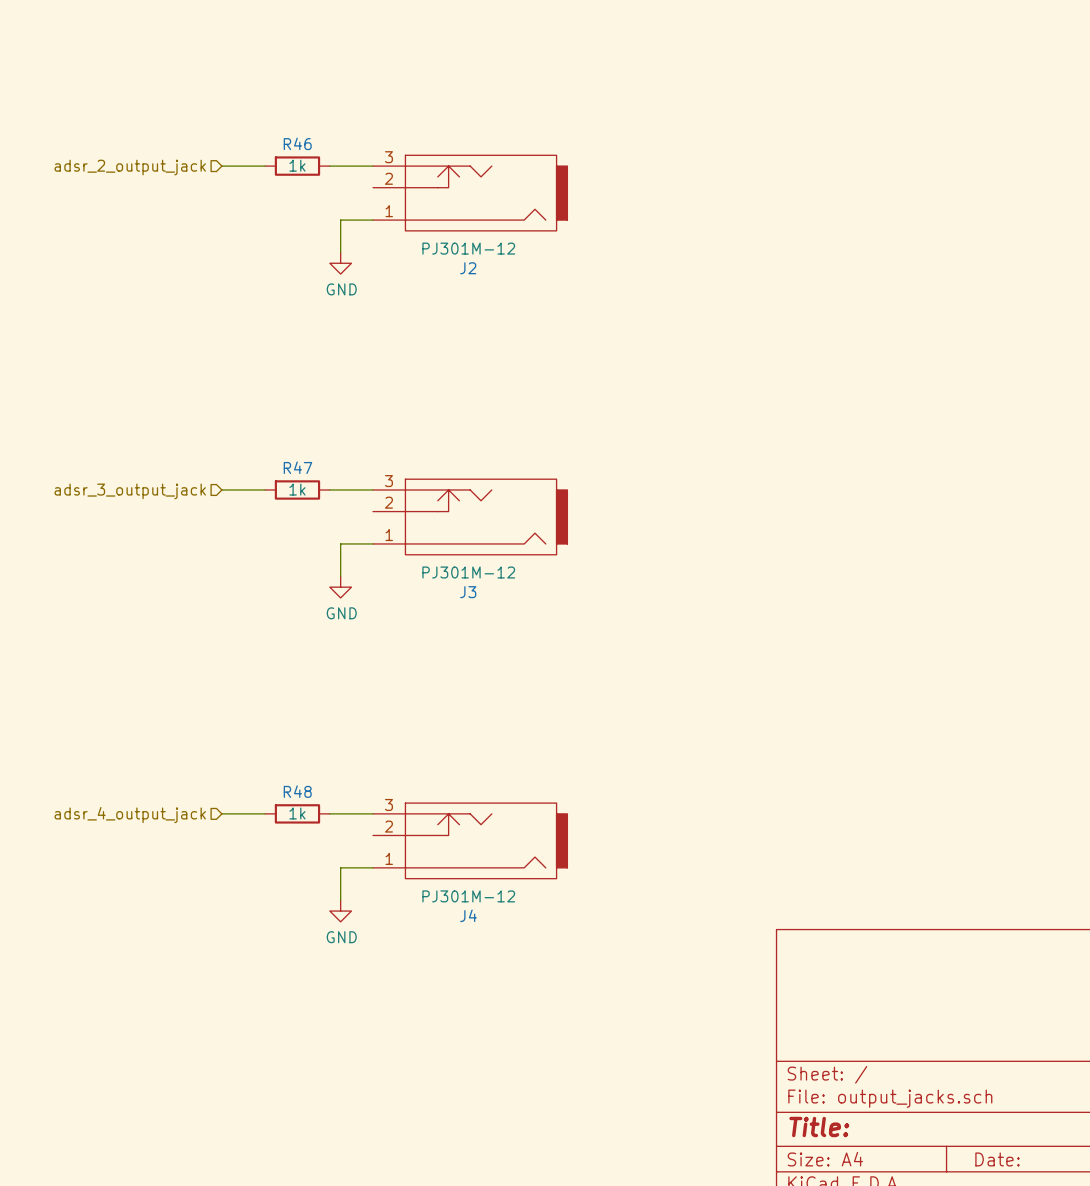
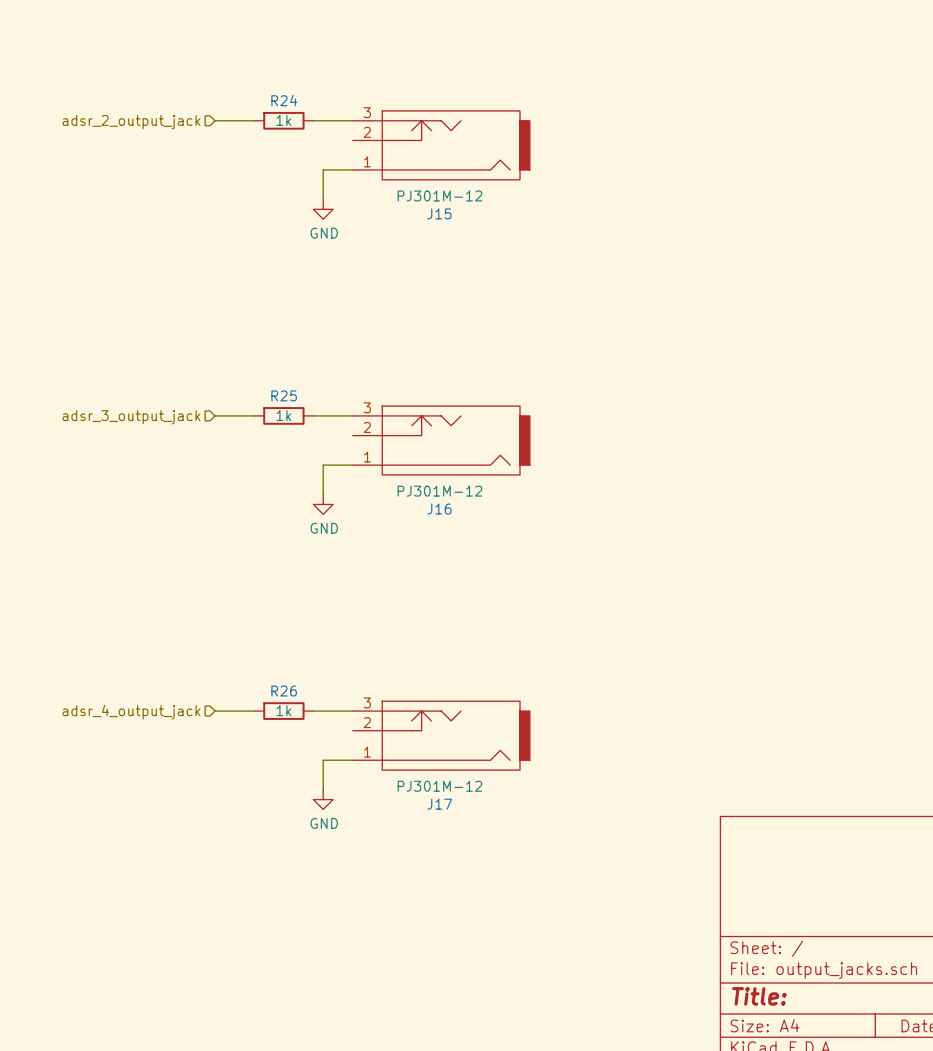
R46 name: R46 (297, 143) -> R24 (284, 100)
J2 name: J2 (468, 268) -> J15 (439, 213)
R47 name: R47 (297, 467) -> R25 (284, 395)
J3 name: J3 (468, 592) -> J16 (439, 509)
R48 name: R48 (297, 791) -> R26 (284, 691)
J4 name: J4 (468, 915) -> J17 (439, 804)

